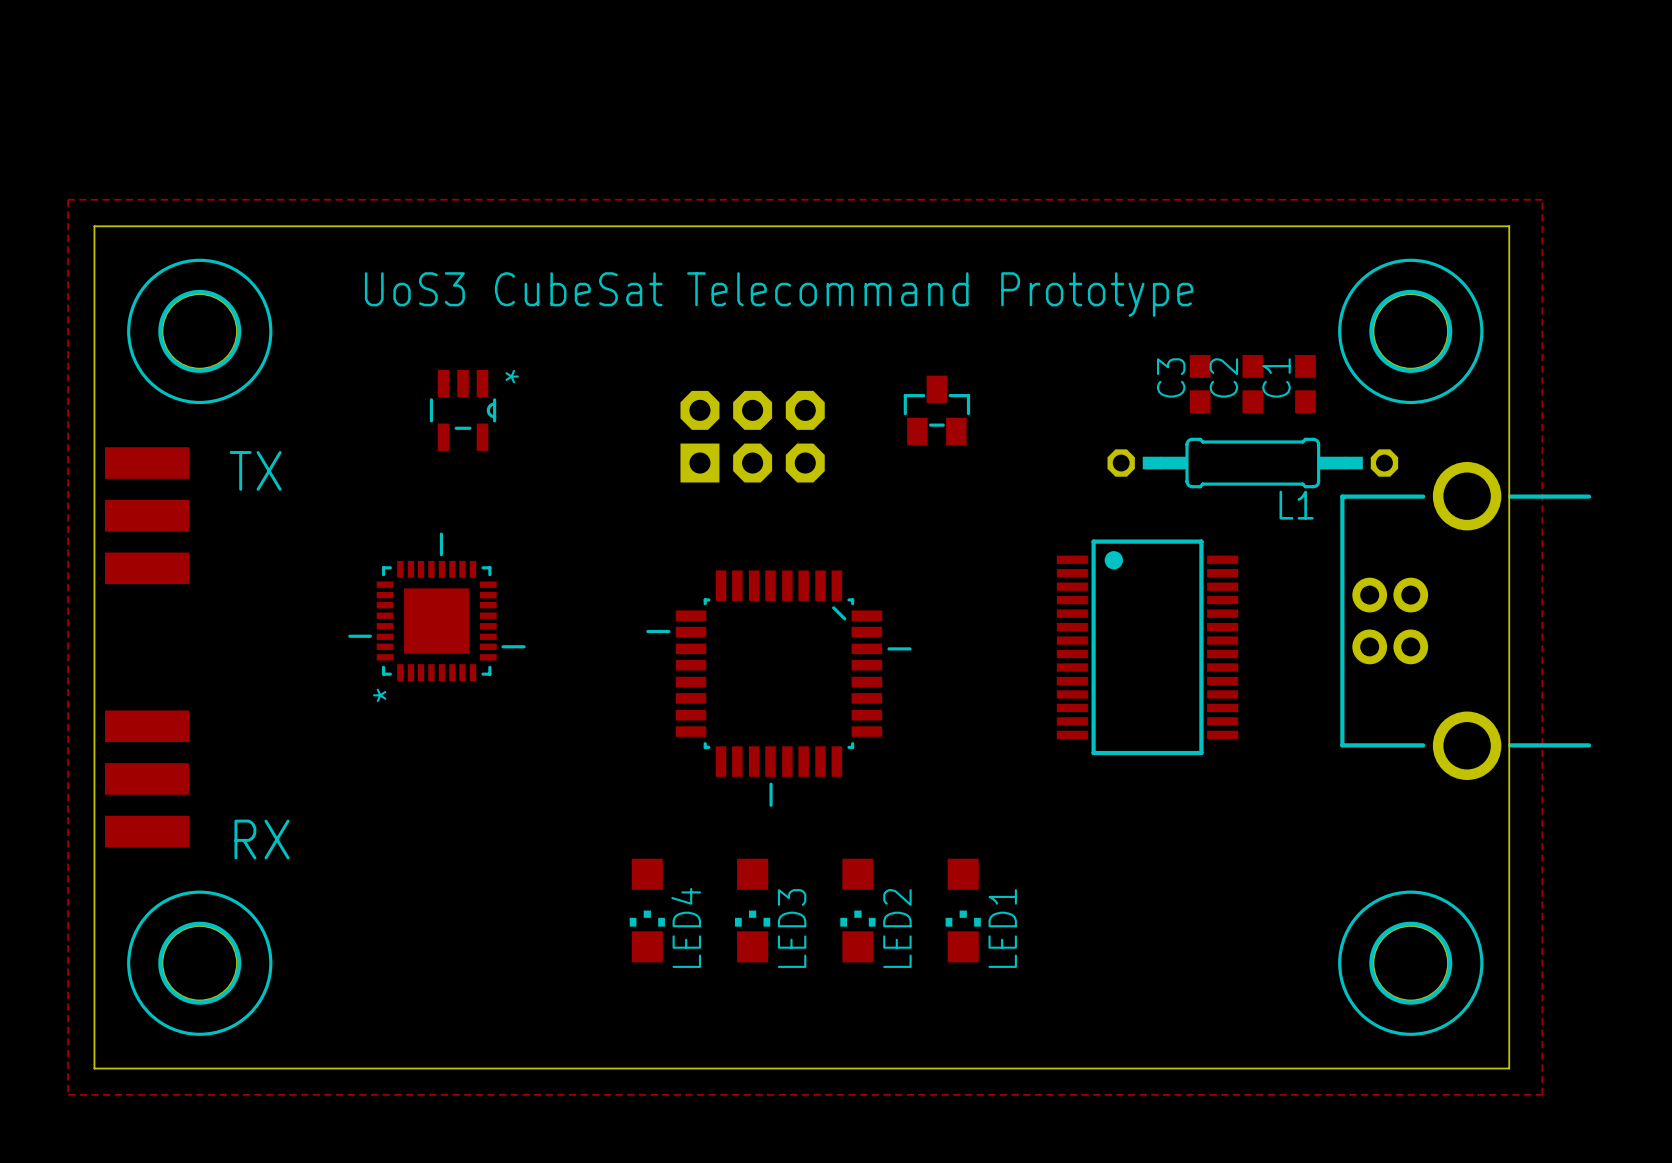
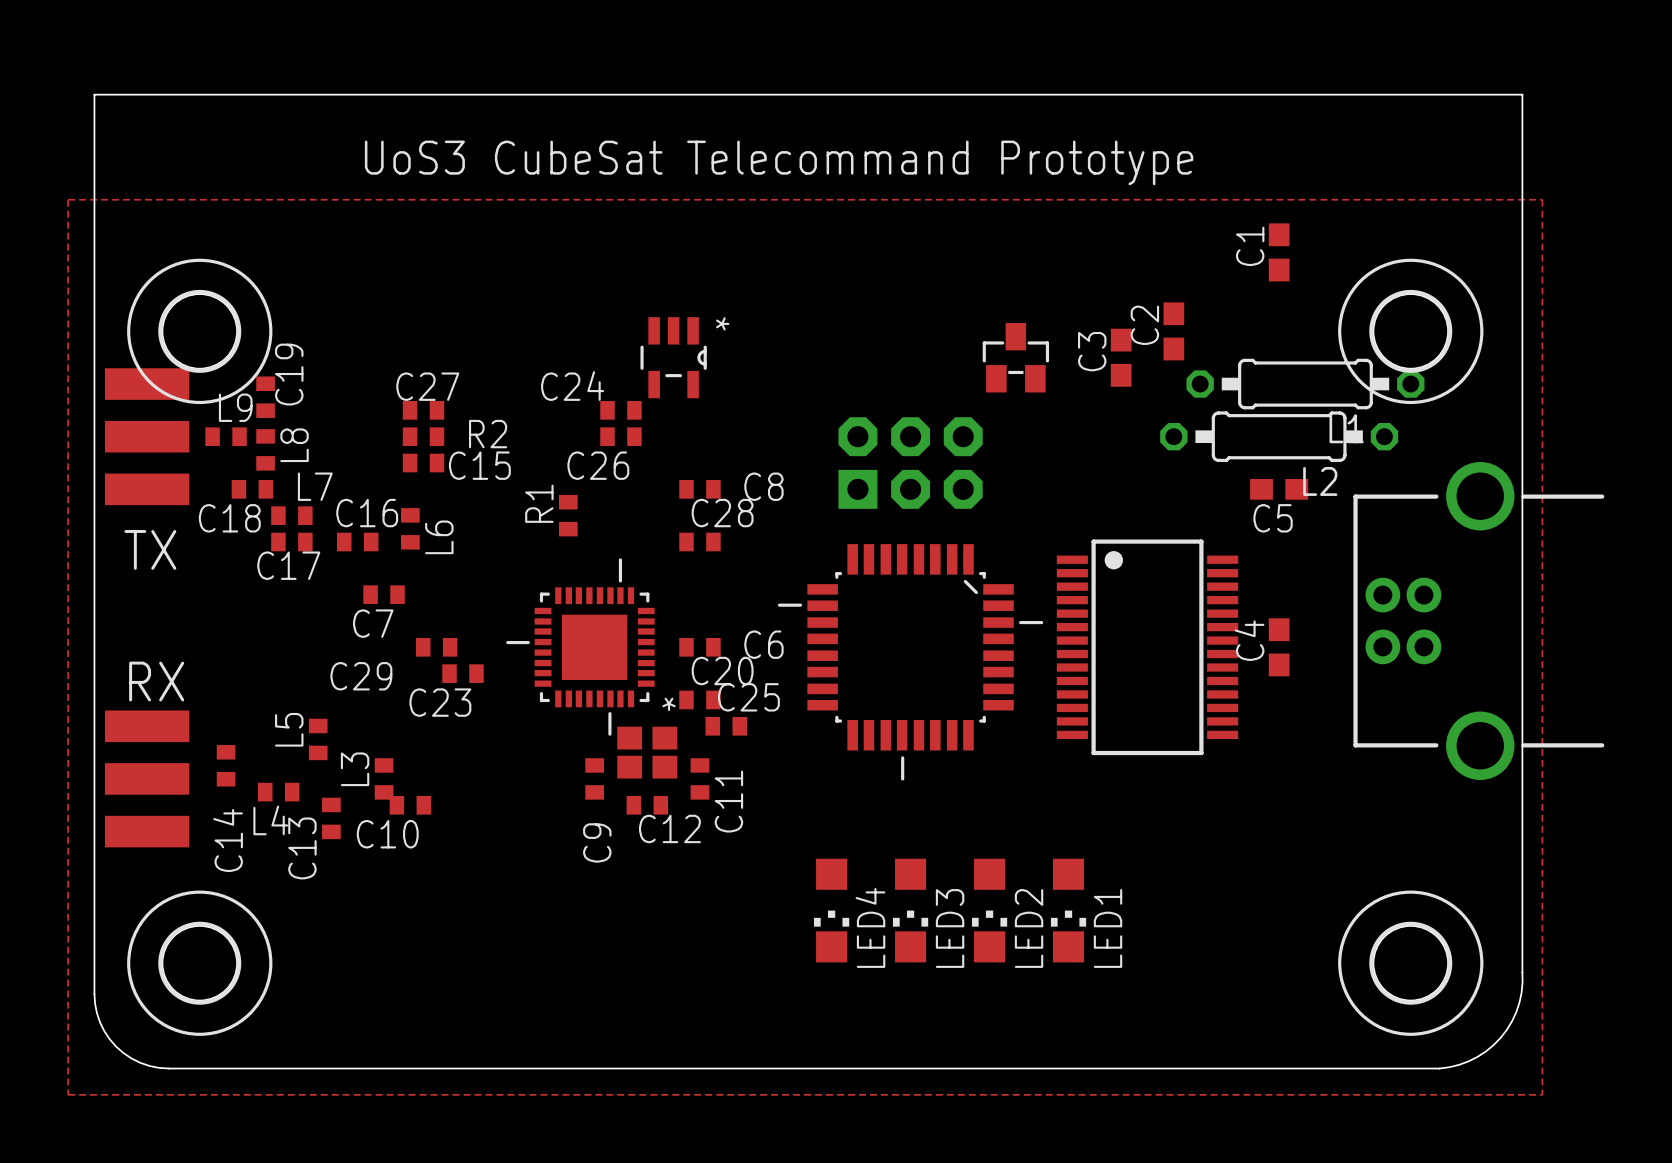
board edge: (94, 226) (1509, 226) (1509, 1068) (1439, 1068) -> (94, 226) (94, 94) (1522, 94) (1522, 982) (1519, 1002) (1512, 1021) (1493, 1044) (1468, 1061) (1439, 1068)
text position: UoS3 CubeSat Telecommand Prototype (779, 294) -> UoS3 CubeSat Telecommand Prototype (779, 162)
C3 position: (1200, 384) -> (1121, 357)
C2 position: (1252, 384) -> (1173, 331)
C1 position: (1305, 384) -> (1279, 252)
C19: none -> (265, 397)
C27: none -> (423, 410)
part position: (463, 410) -> (673, 357)
C24: none -> (620, 410)
part position: (936, 410) -> (1015, 357)
L9: none -> (226, 436)
R2: none -> (423, 436)
C26: none -> (620, 436)
part position: (752, 436) -> (910, 463)
L2: none -> (1279, 436)
L1 footprint: [1107, 437, 1399, 489] -> [1186, 358, 1425, 410]
L8: none -> (265, 449)
C15: none -> (423, 463)
text position: TX (255, 470) -> TX (150, 549)
C18: none -> (252, 489)
C8: none -> (699, 489)
C5: none -> (1279, 489)
part position: (147, 515) -> (147, 436)
L7: none -> (291, 515)
R1: none -> (568, 515)
L6: none -> (410, 528)
C17: none -> (291, 542)
C16: none -> (357, 542)
C28: none -> (699, 542)
C7: none -> (384, 594)
part rotation: 0° (436, 606) -> 90° counterclockwise (580, 647)
part position: (436, 606) -> (580, 647)
part position: (1465, 620) -> (1478, 620)
C29: none -> (436, 647)
C6: none -> (699, 647)
C4: none -> (1279, 647)
C23: none -> (463, 673)
part position: (778, 688) -> (910, 662)
C20: none -> (699, 699)
C25: none -> (726, 726)
L5: none -> (318, 739)
part: none -> (647, 752)
C14: none -> (226, 765)
L3: none -> (384, 778)
C9: none -> (594, 778)
C11: none -> (699, 778)
L4: none -> (278, 792)
C10: none -> (410, 805)
C12: none -> (647, 805)
C13: none -> (331, 818)
text position: RX (261, 839) -> RX (156, 681)
LED4 position: (647, 910) -> (831, 910)
LED3 position: (752, 910) -> (910, 910)
LED2 position: (857, 910) -> (989, 910)
LED1 position: (963, 910) -> (1068, 910)
board edge: (94, 994) (94, 1068) (168, 1068) -> (94, 994) (100, 1022) (116, 1046) (140, 1062) (168, 1068)

